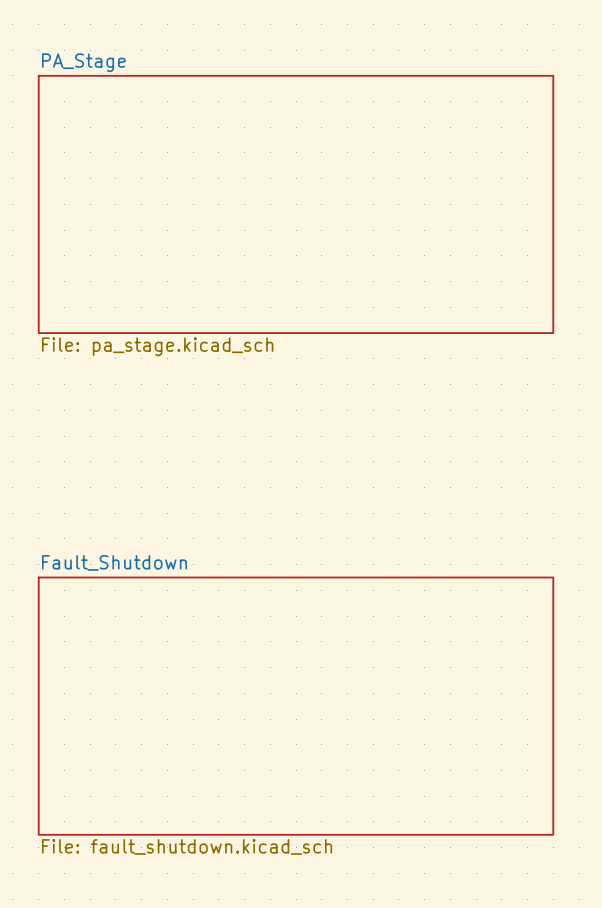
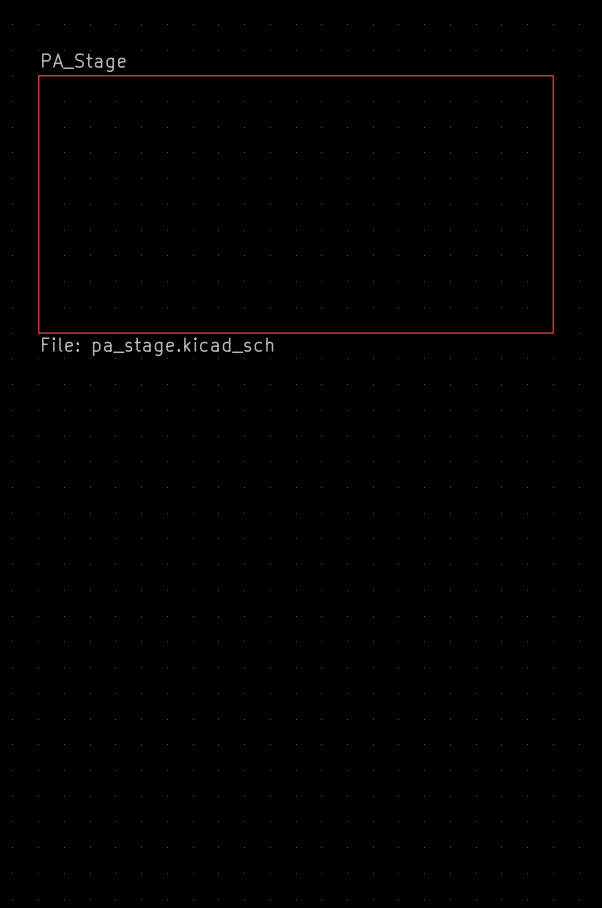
sheet Fault_Shutdown: File: fault_shutdown.kicad_sch (296, 706) -> none

